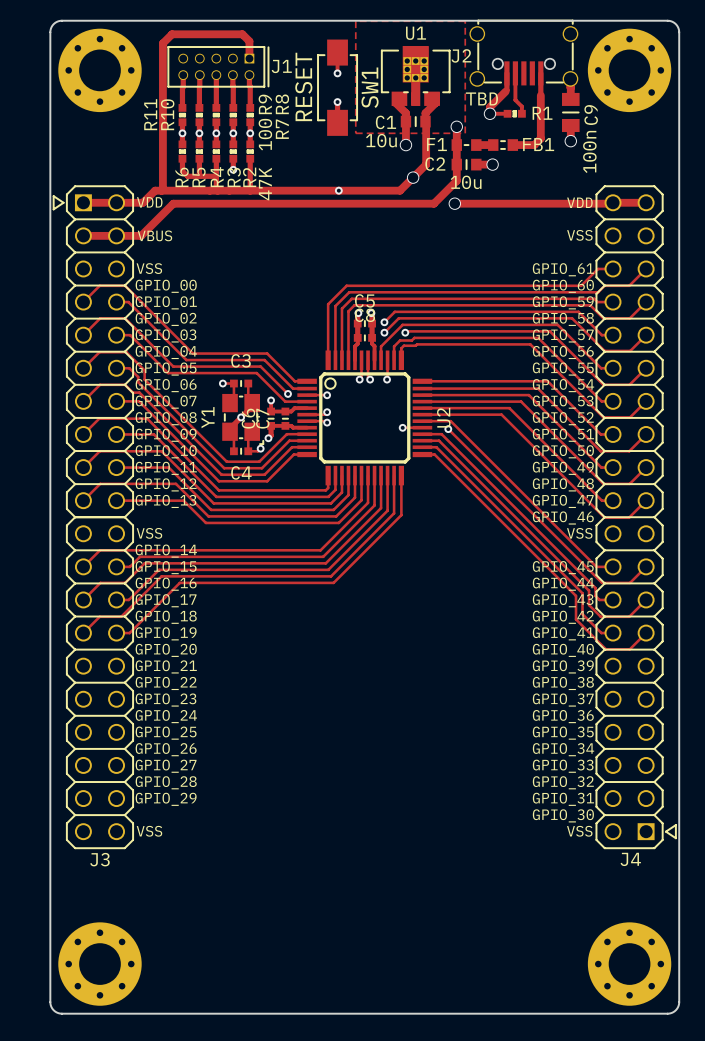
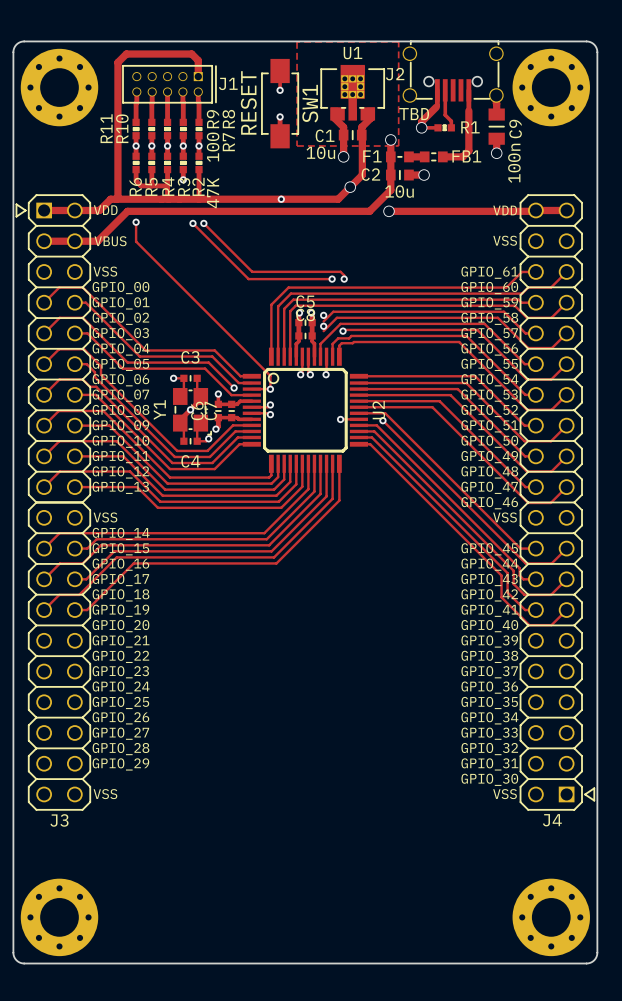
track: none -> (136, 222) (136, 241) (270, 375) (270, 389)
via: none -> (136, 222)
track: none -> (192, 223) (248, 279) (332, 279)
via: none -> (192, 223)
track: none -> (203, 223) (252, 271) (340, 271) (344, 275) (344, 279)
via: none -> (203, 223)
via: none -> (332, 279)
via: none -> (344, 279)
via: none -> (323, 315)
via: (384, 322) -> none
via: none -> (323, 326)
via: (384, 332) -> none

